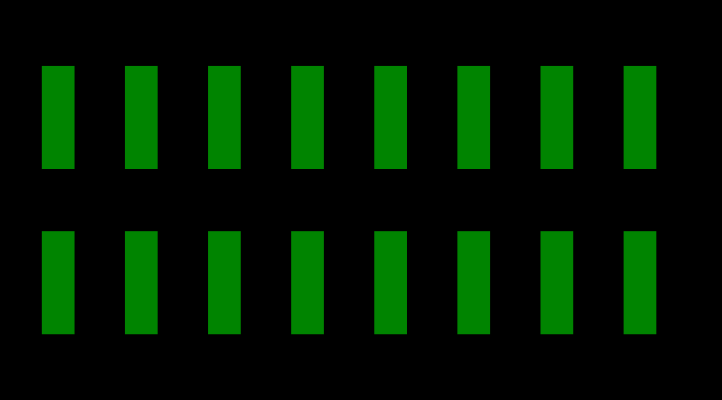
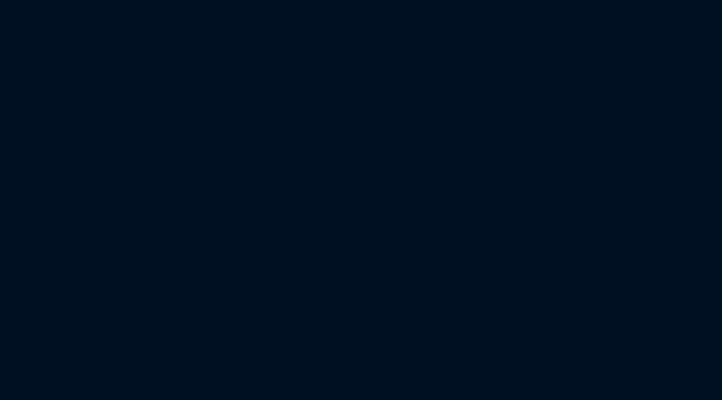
part: (182, 200) -> none
part: (515, 200) -> none

